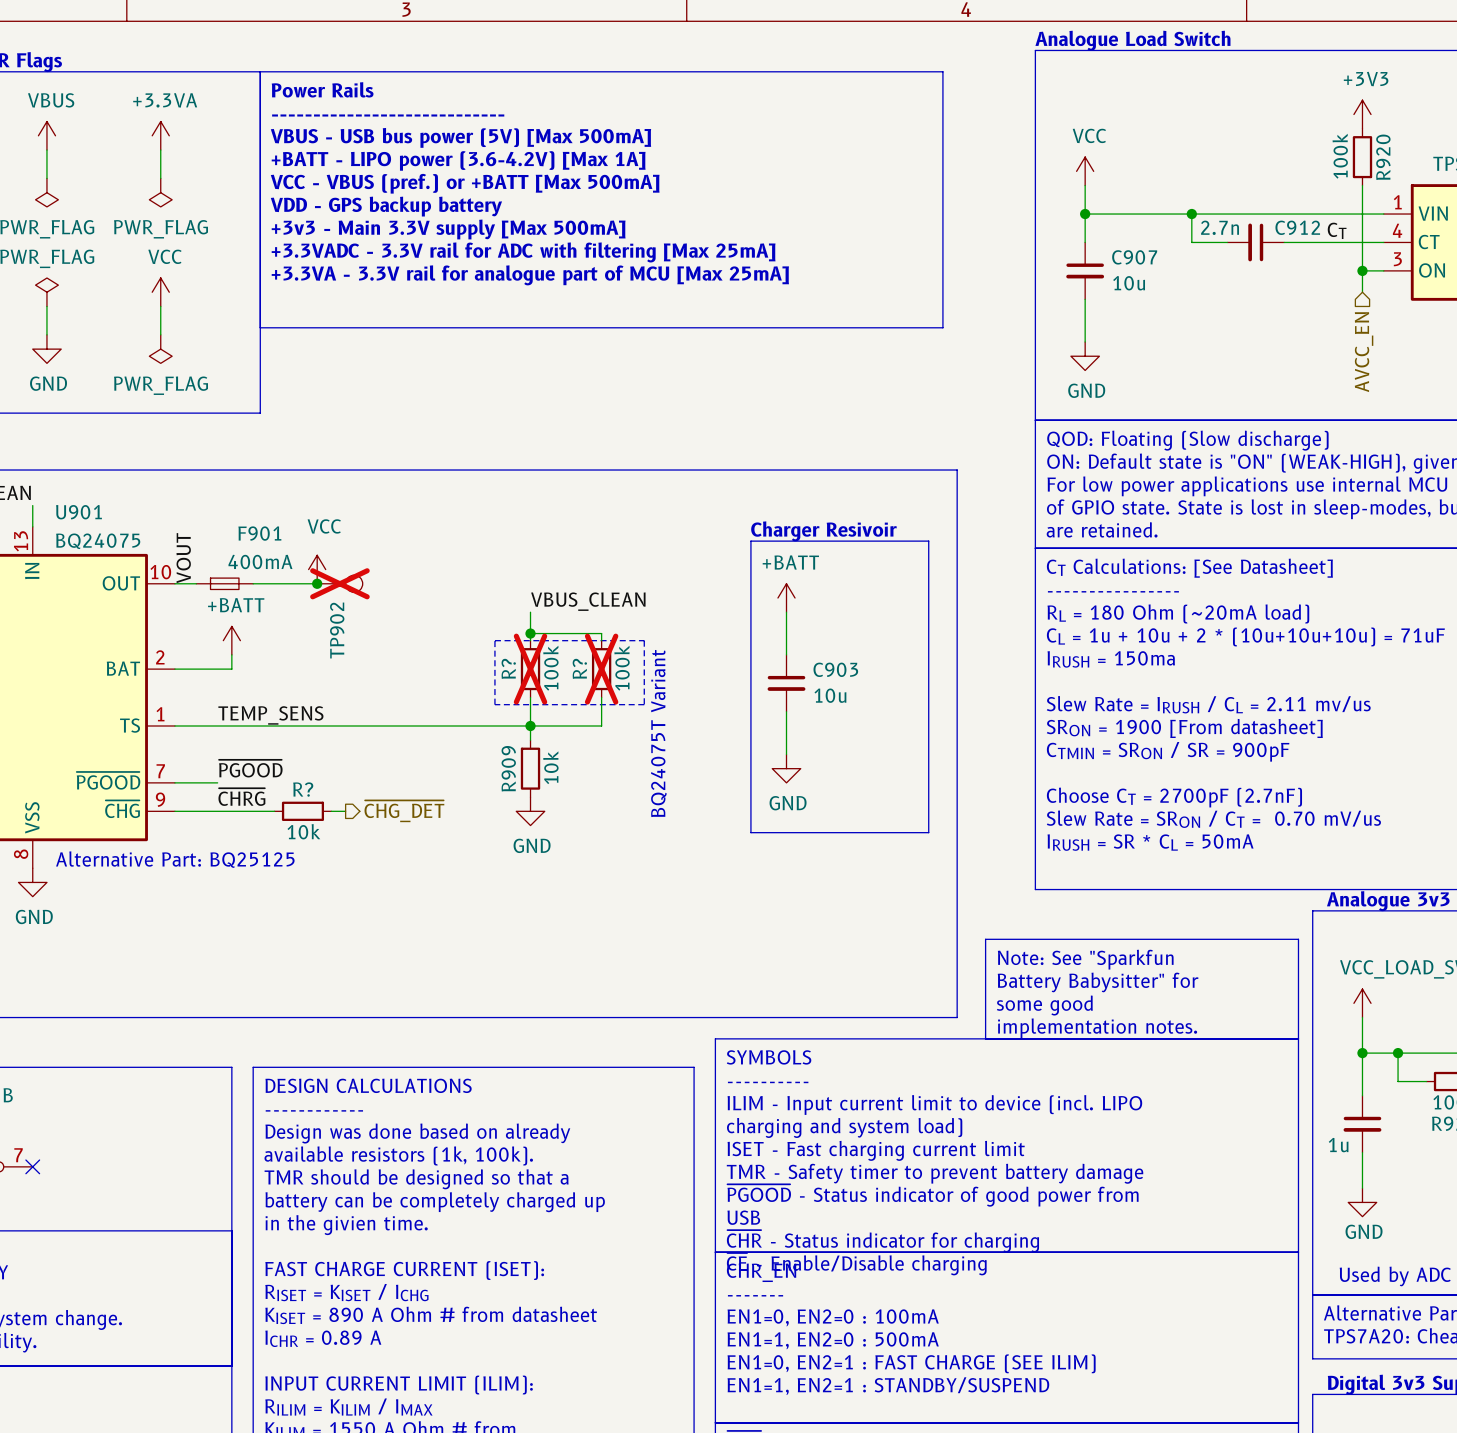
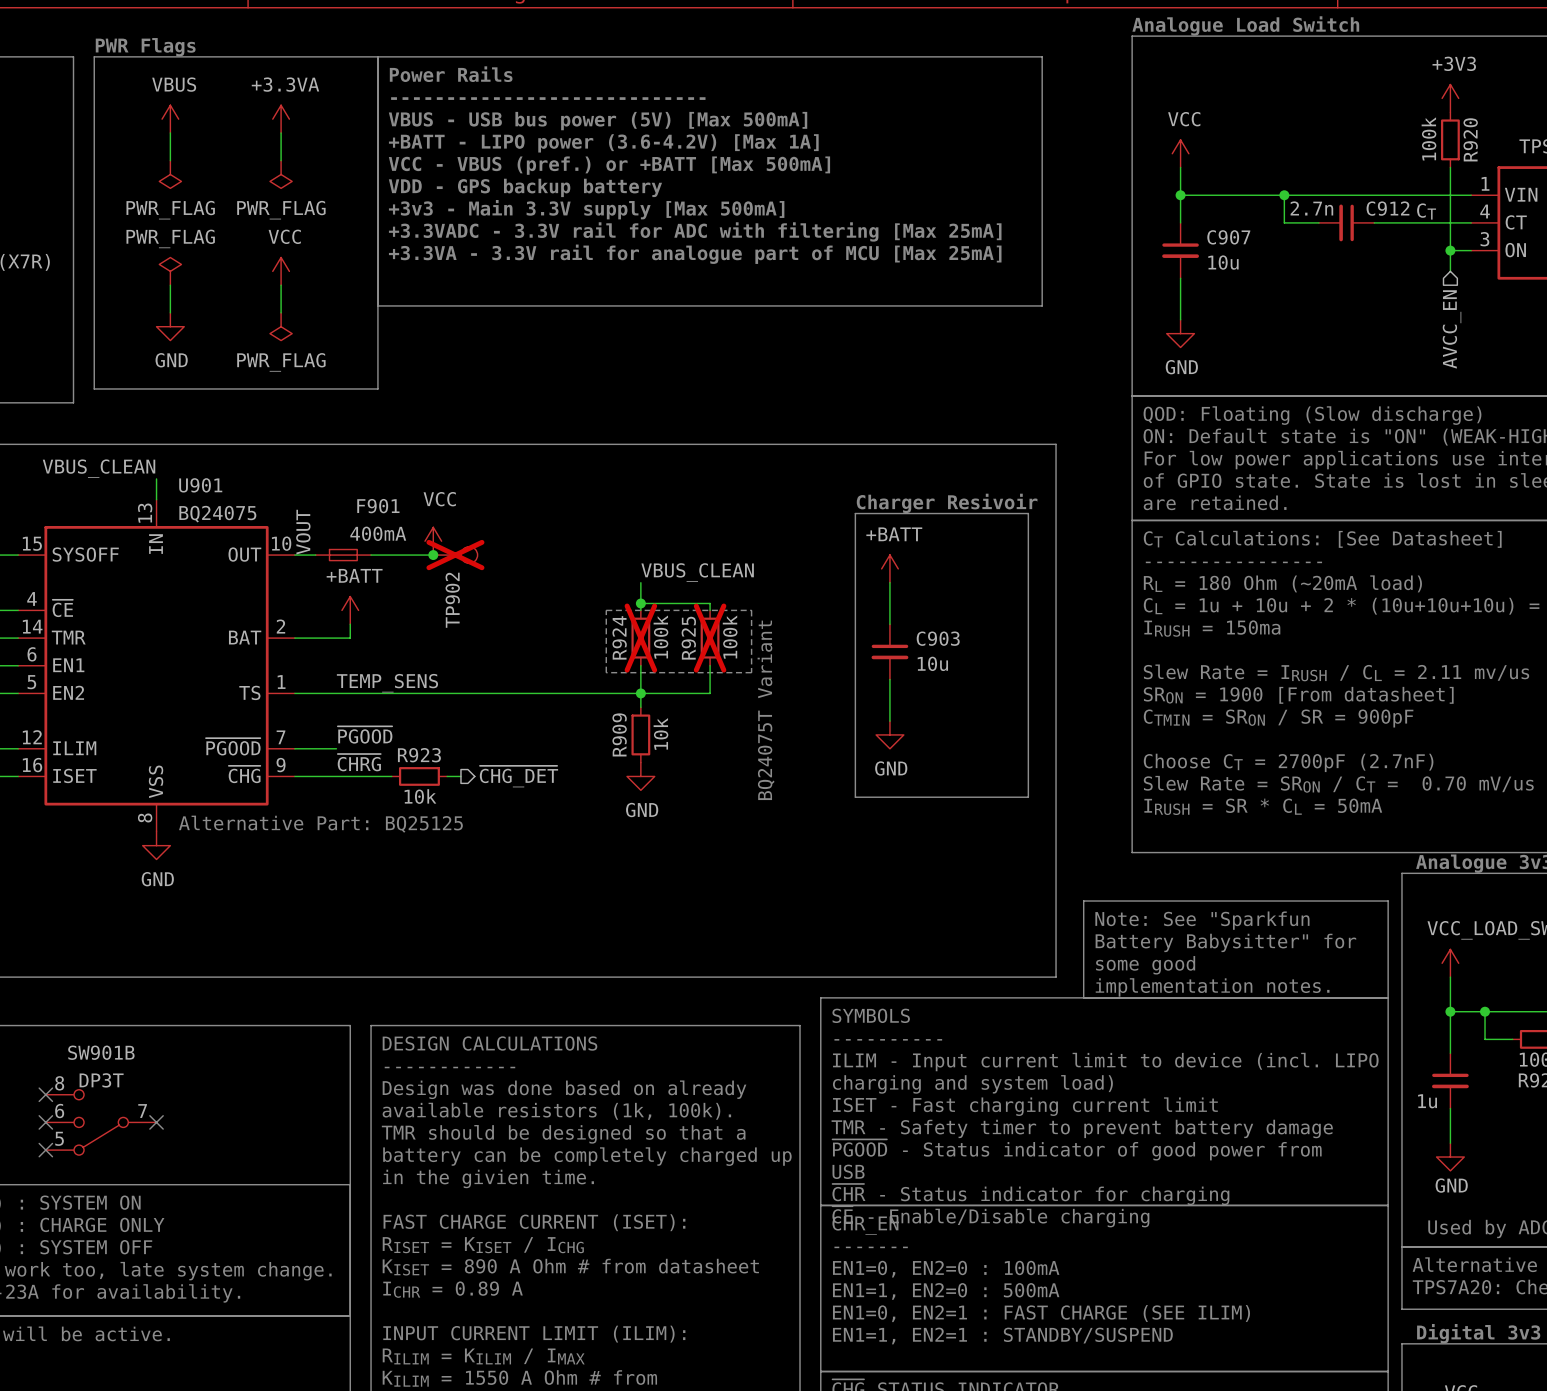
R? name: R? (508, 668) -> R924 (619, 637)
R? name: R? (579, 668) -> R925 (688, 638)
R? name: R? (303, 789) -> R923 (419, 755)

